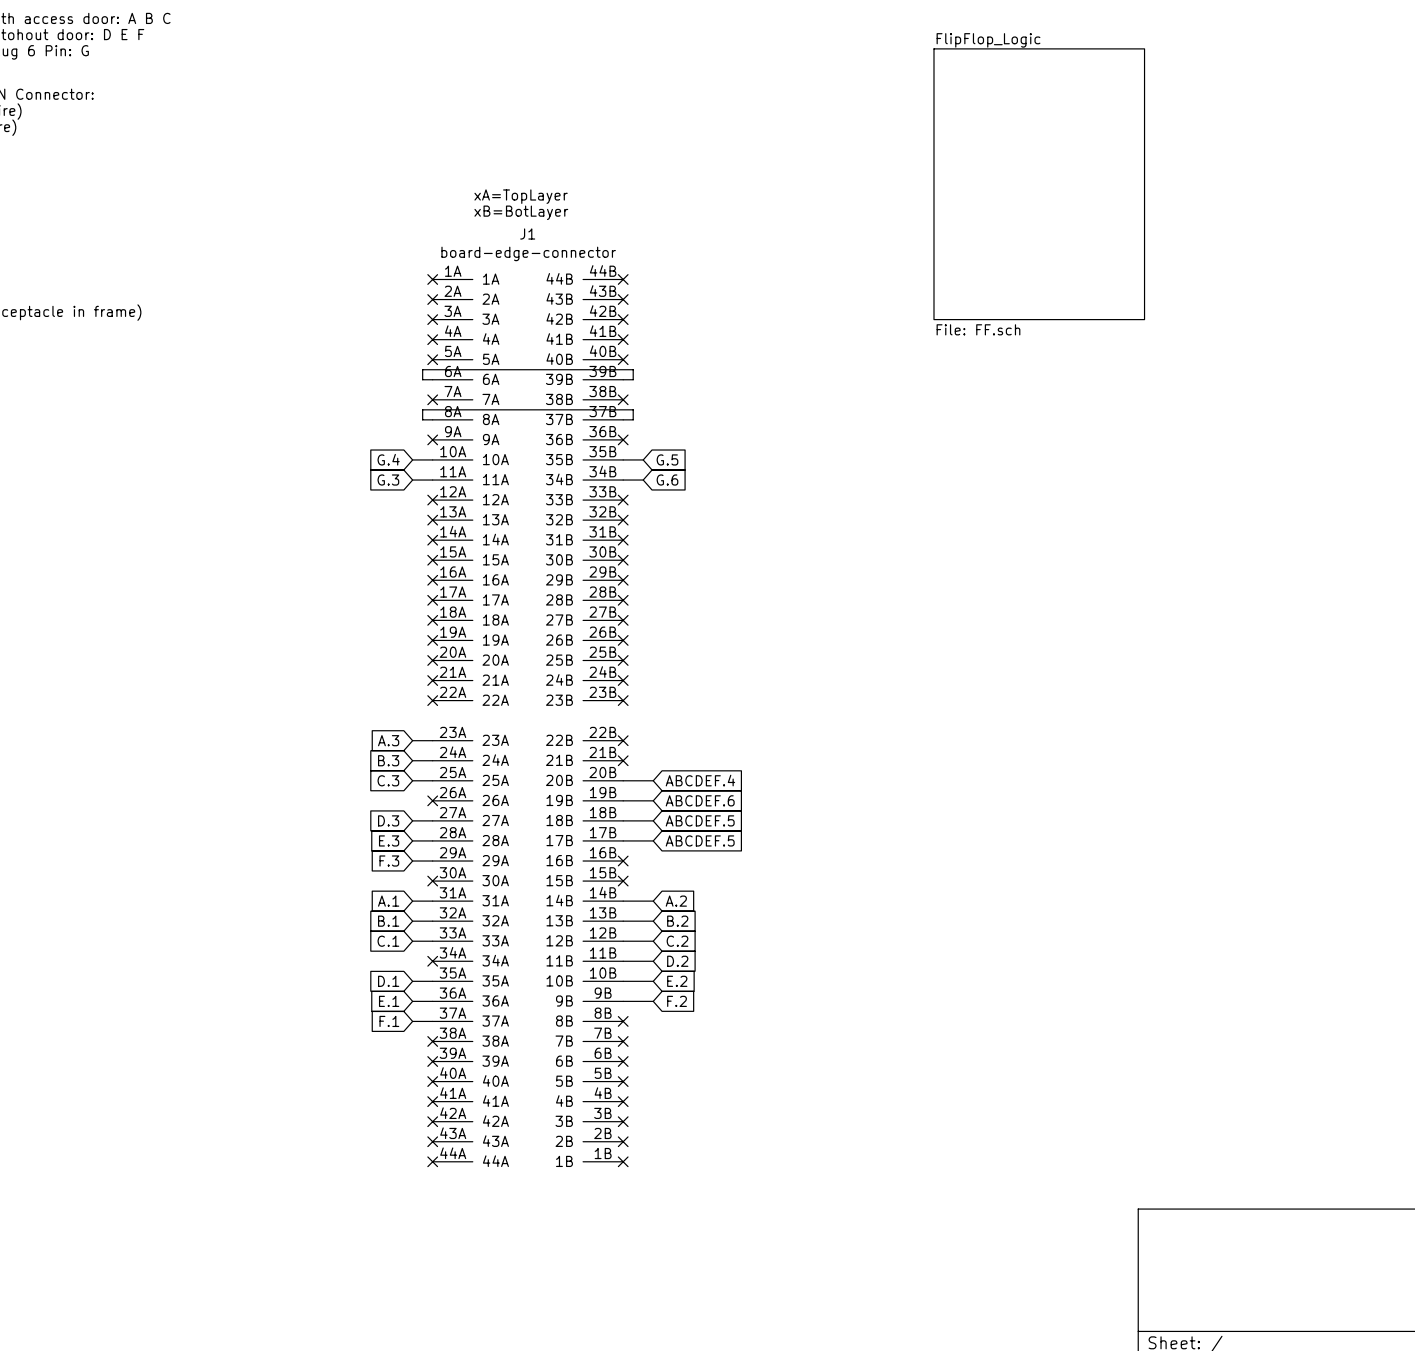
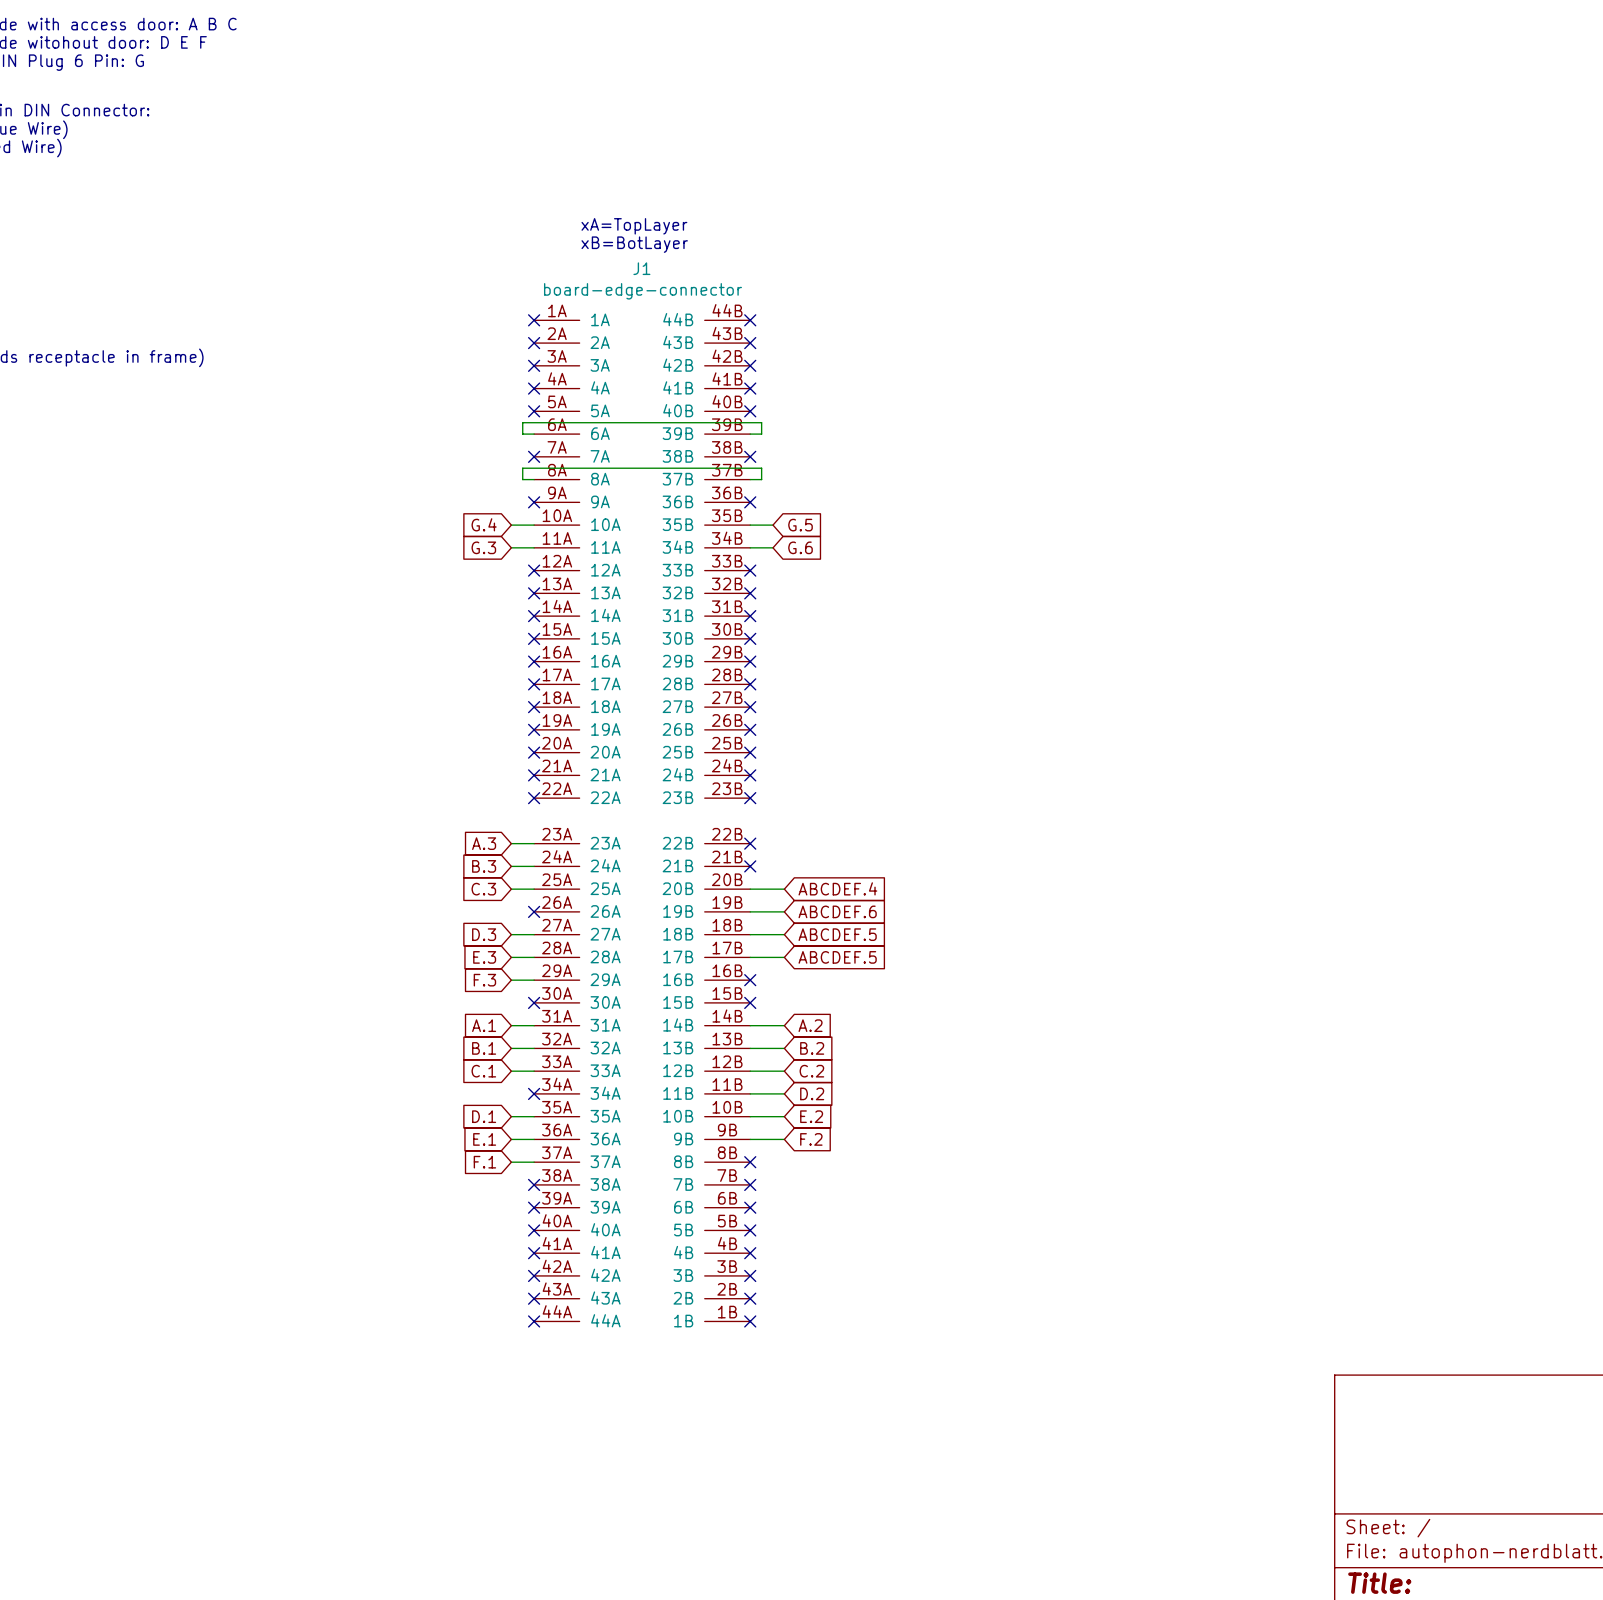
sheet FlipFlop_Logic: File: FF.sch (1039, 184) -> none

